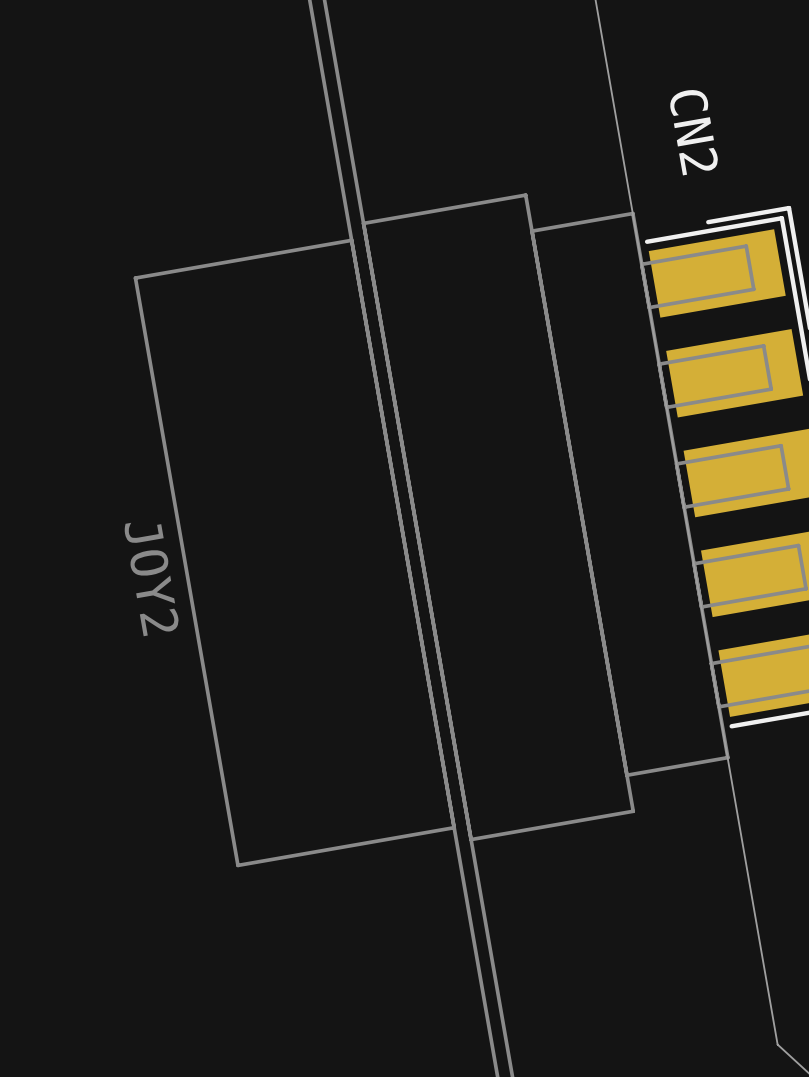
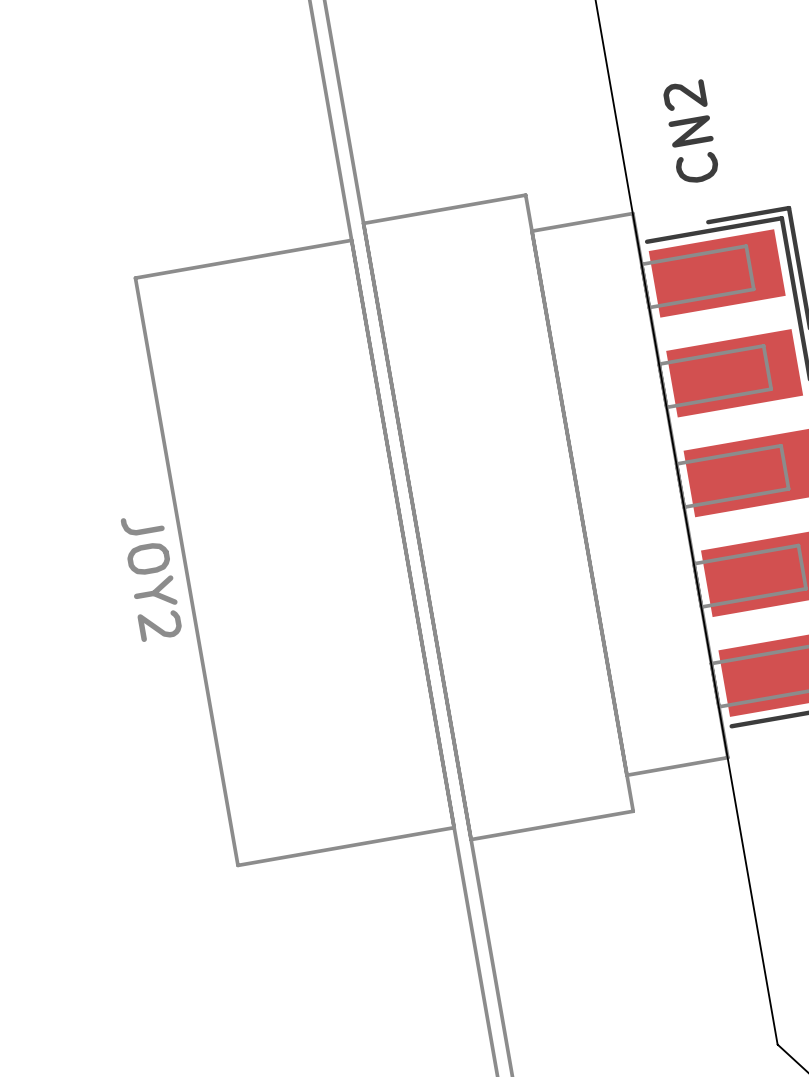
CN2 name rotation: 0° (693, 132) -> 180° (690, 130)

